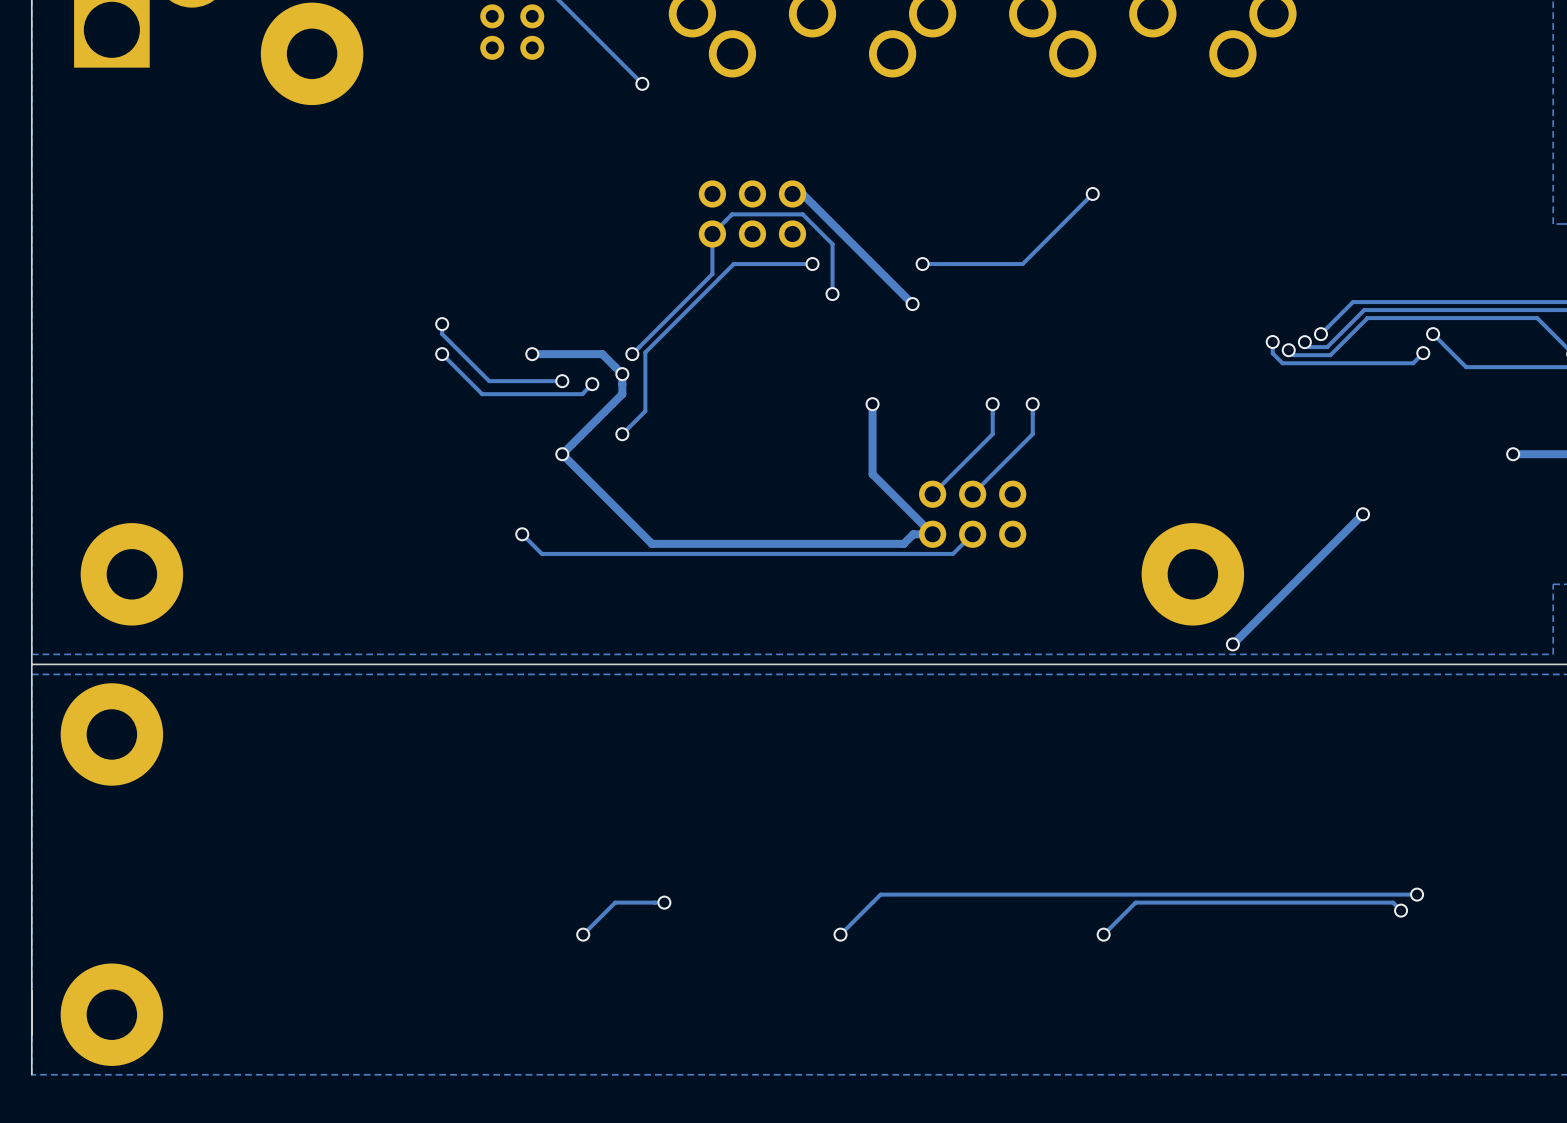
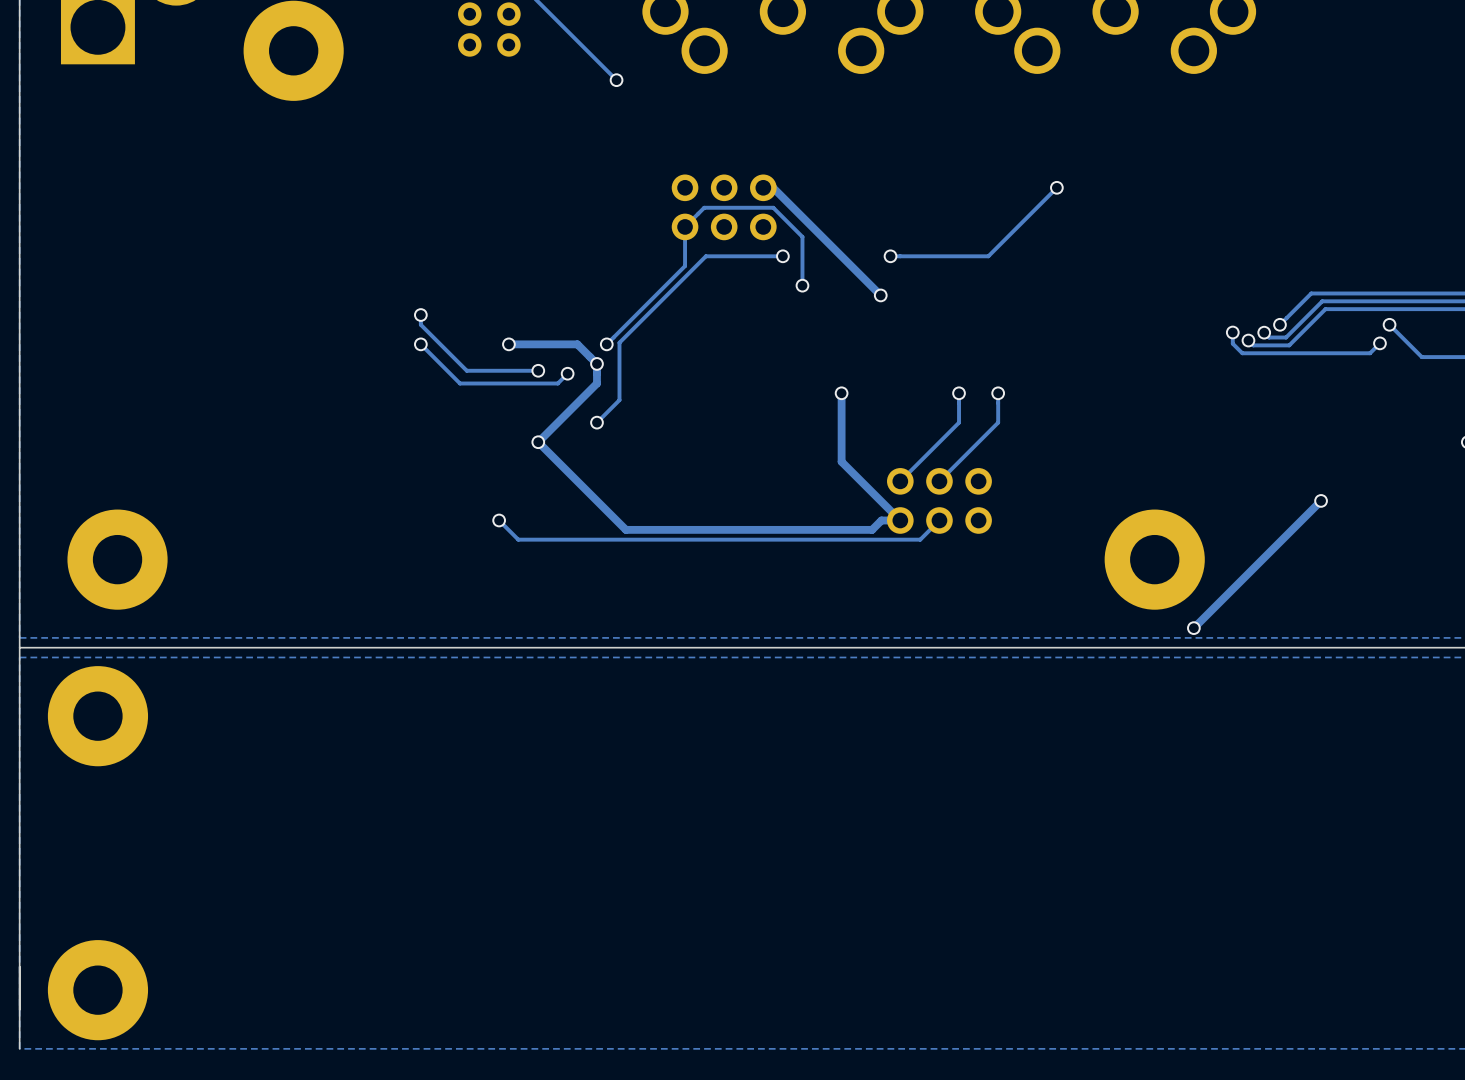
track: (1417, 894) (880, 894) (840, 934) -> none
via: (1417, 894) -> none
track: (664, 902) (615, 902) (583, 934) -> none
via: (664, 902) -> none
track: (1401, 910) (1393, 902) (1135, 902) (1103, 934) -> none
via: (1401, 910) -> none
via: (583, 934) -> none
via: (840, 934) -> none
via: (1103, 934) -> none

